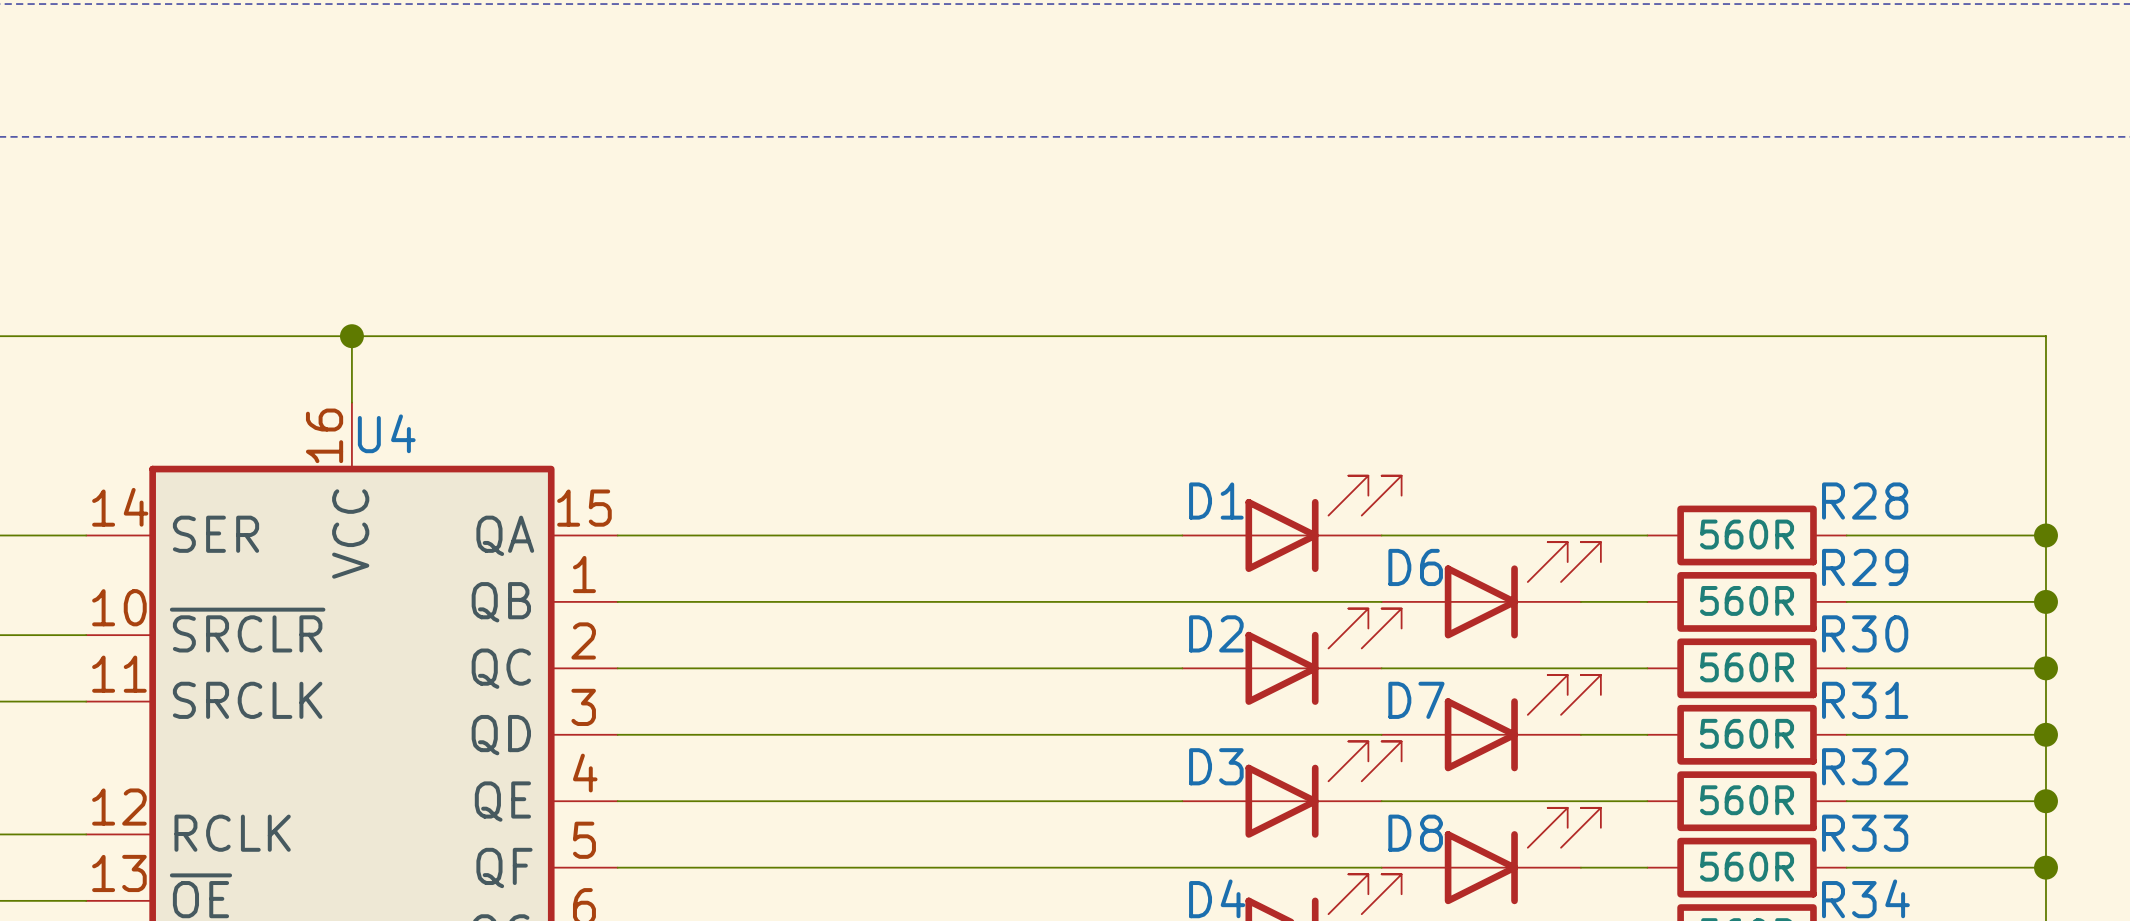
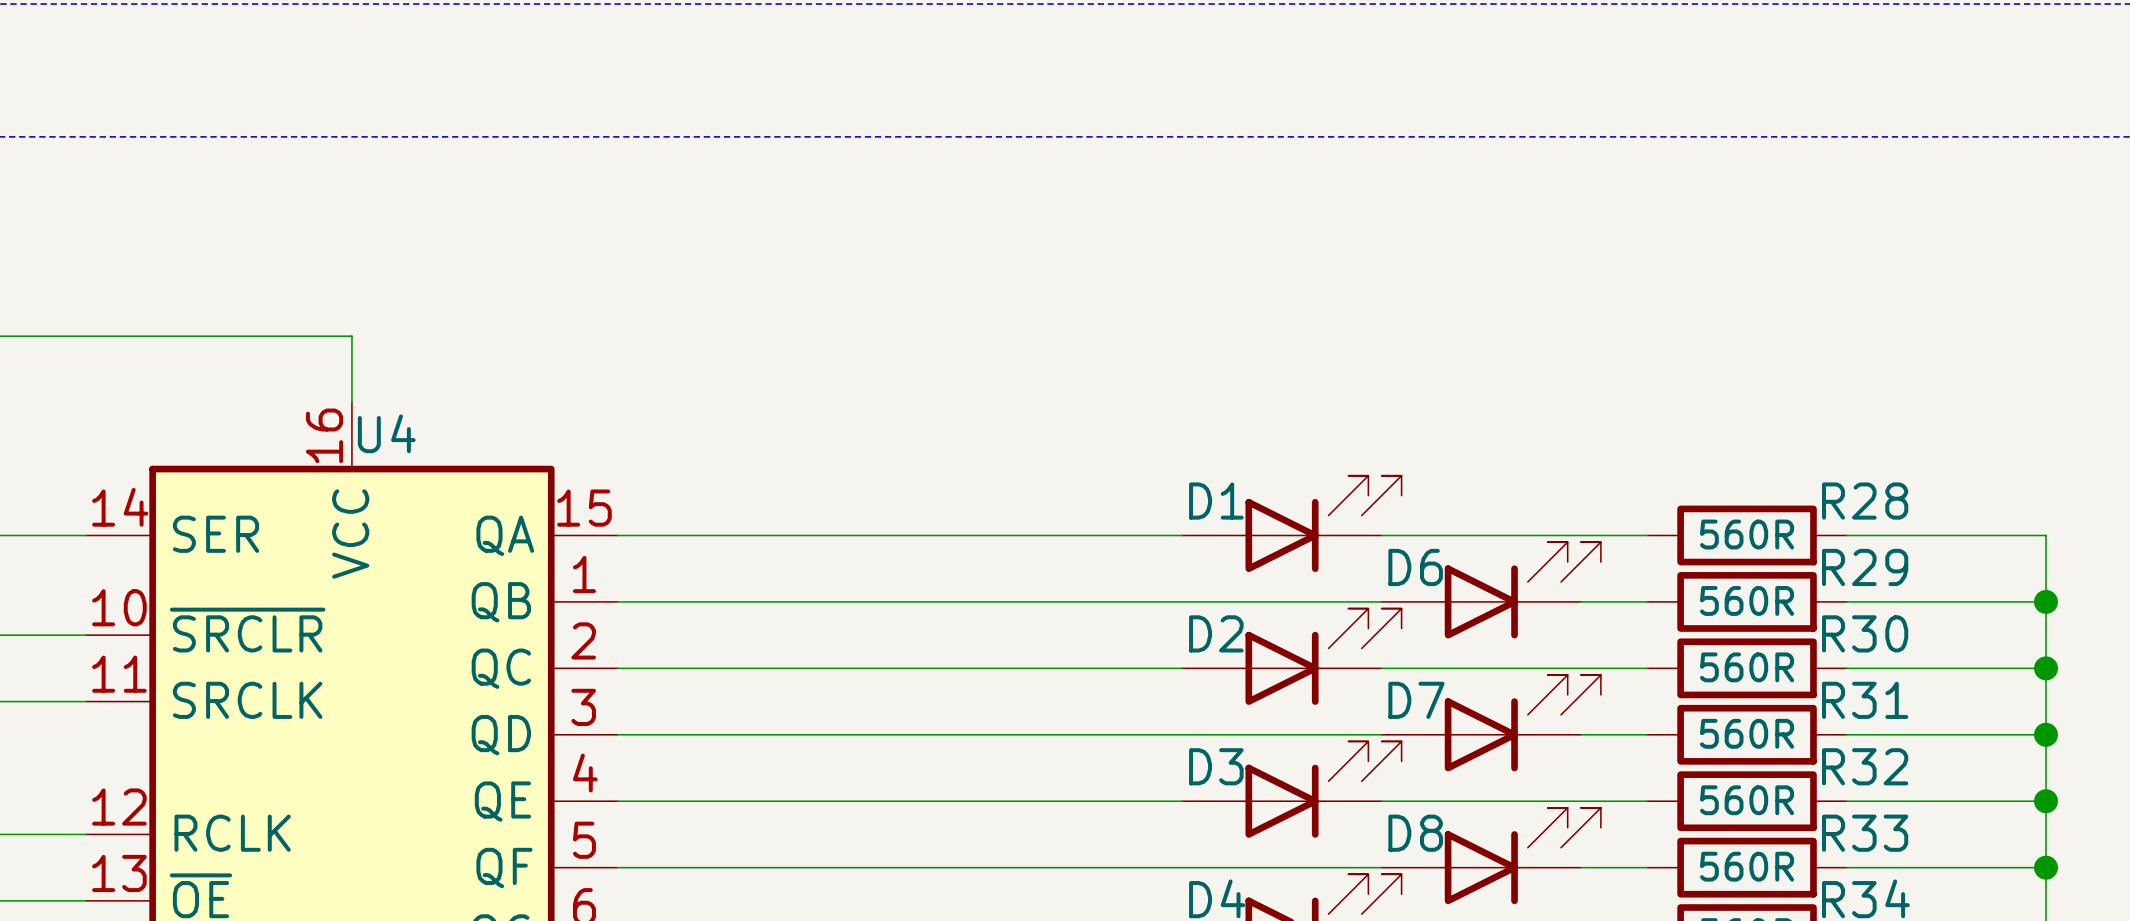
wire: (351, 336) (2045, 336) (2045, 535) -> none
junction: (351, 336) -> none
junction: (2045, 535) -> none

